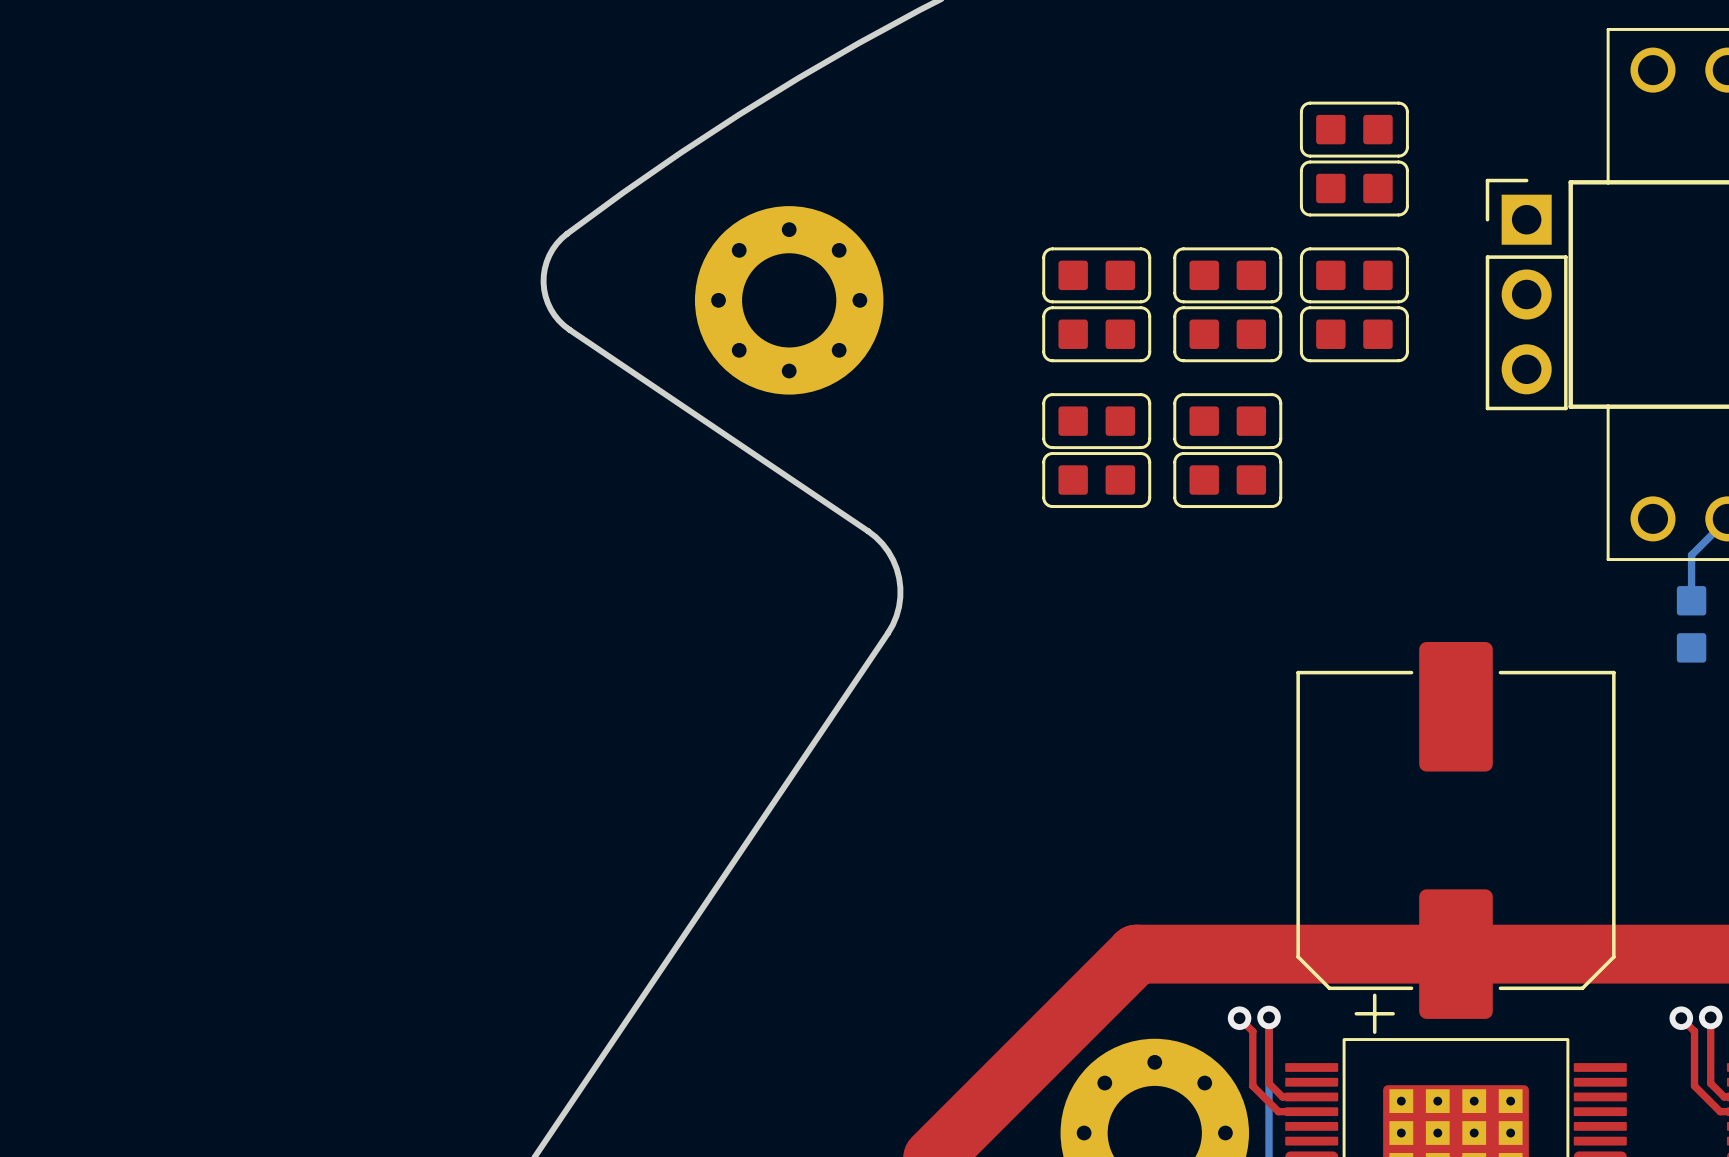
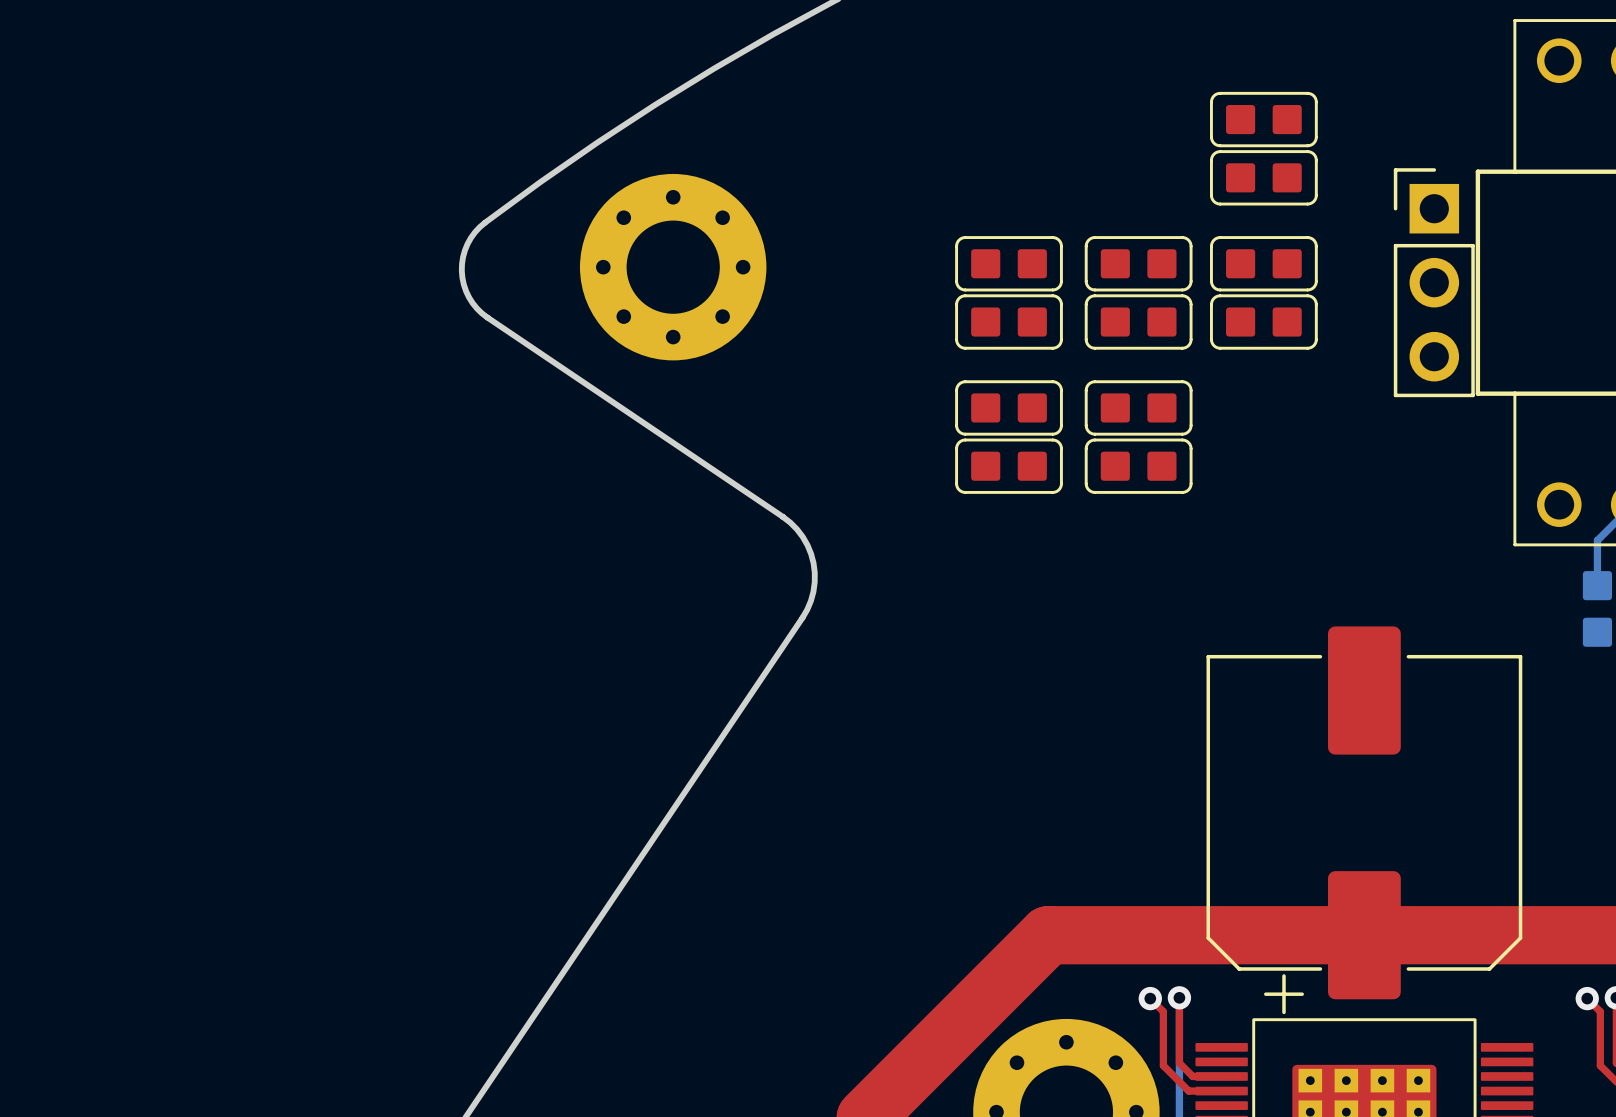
part position: (789, 300) -> (673, 267)

